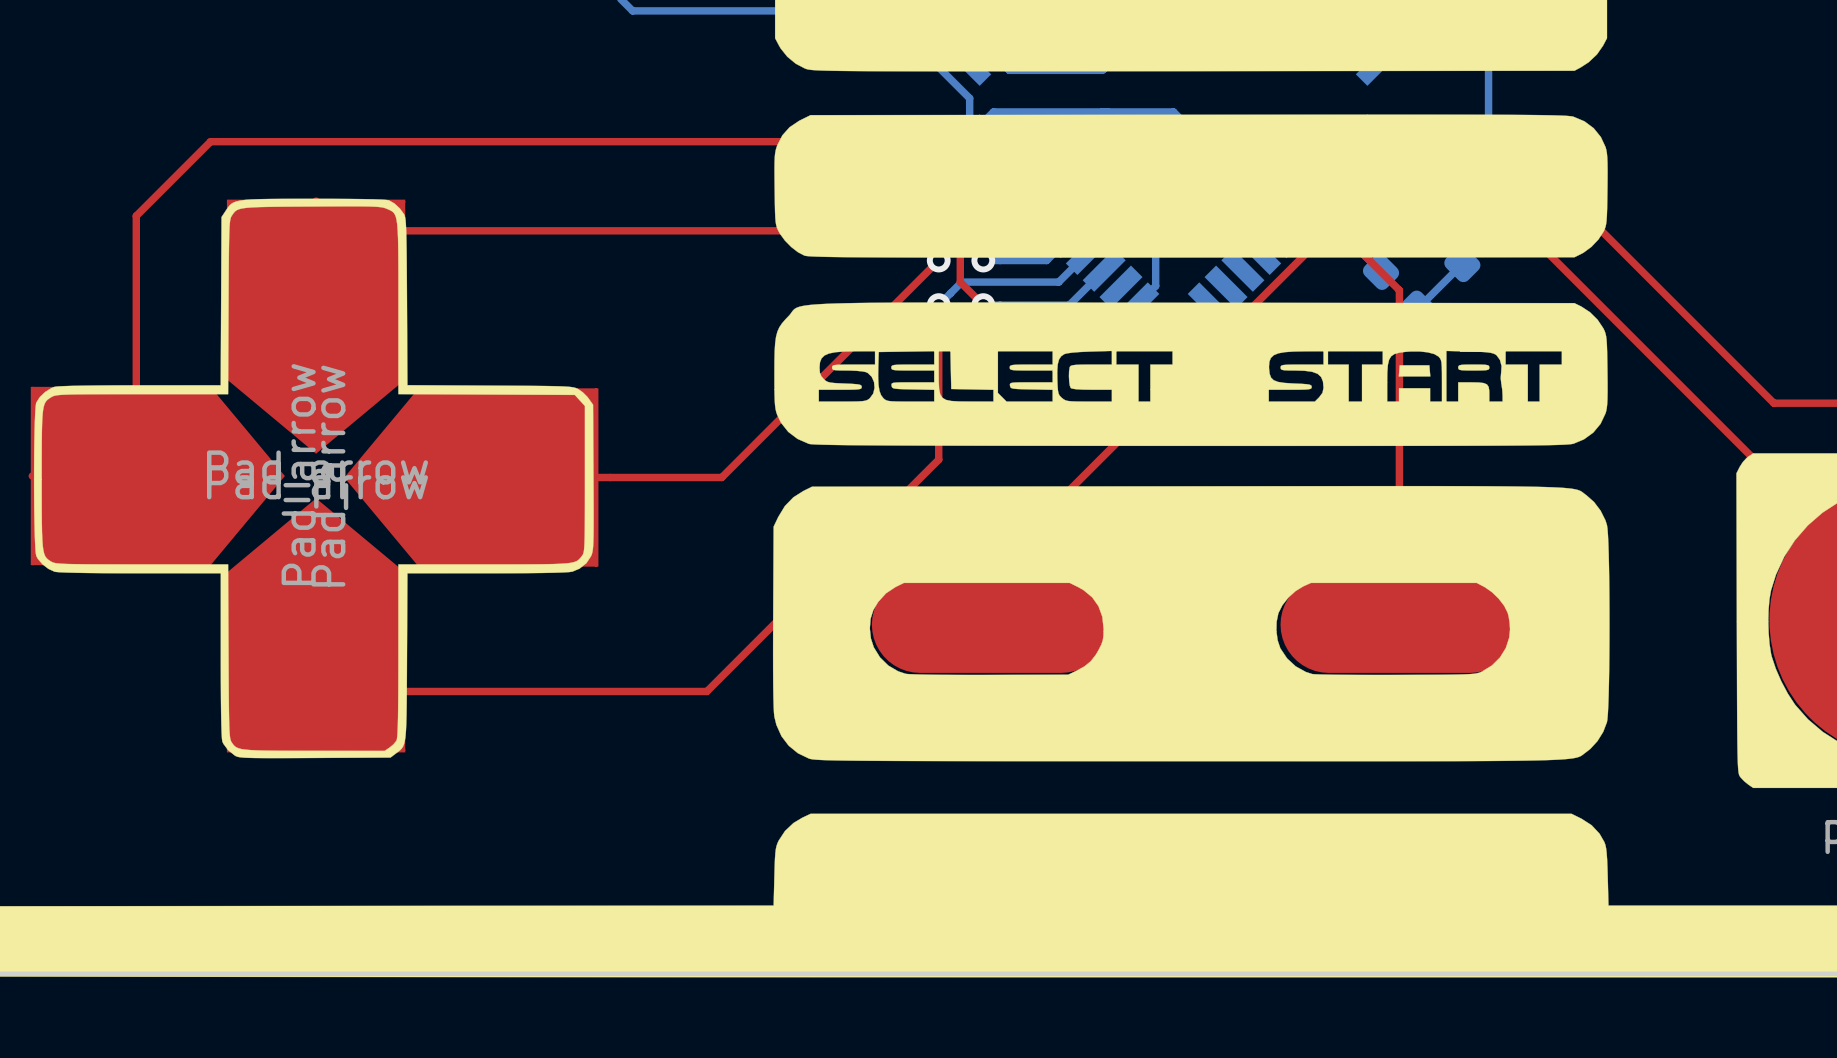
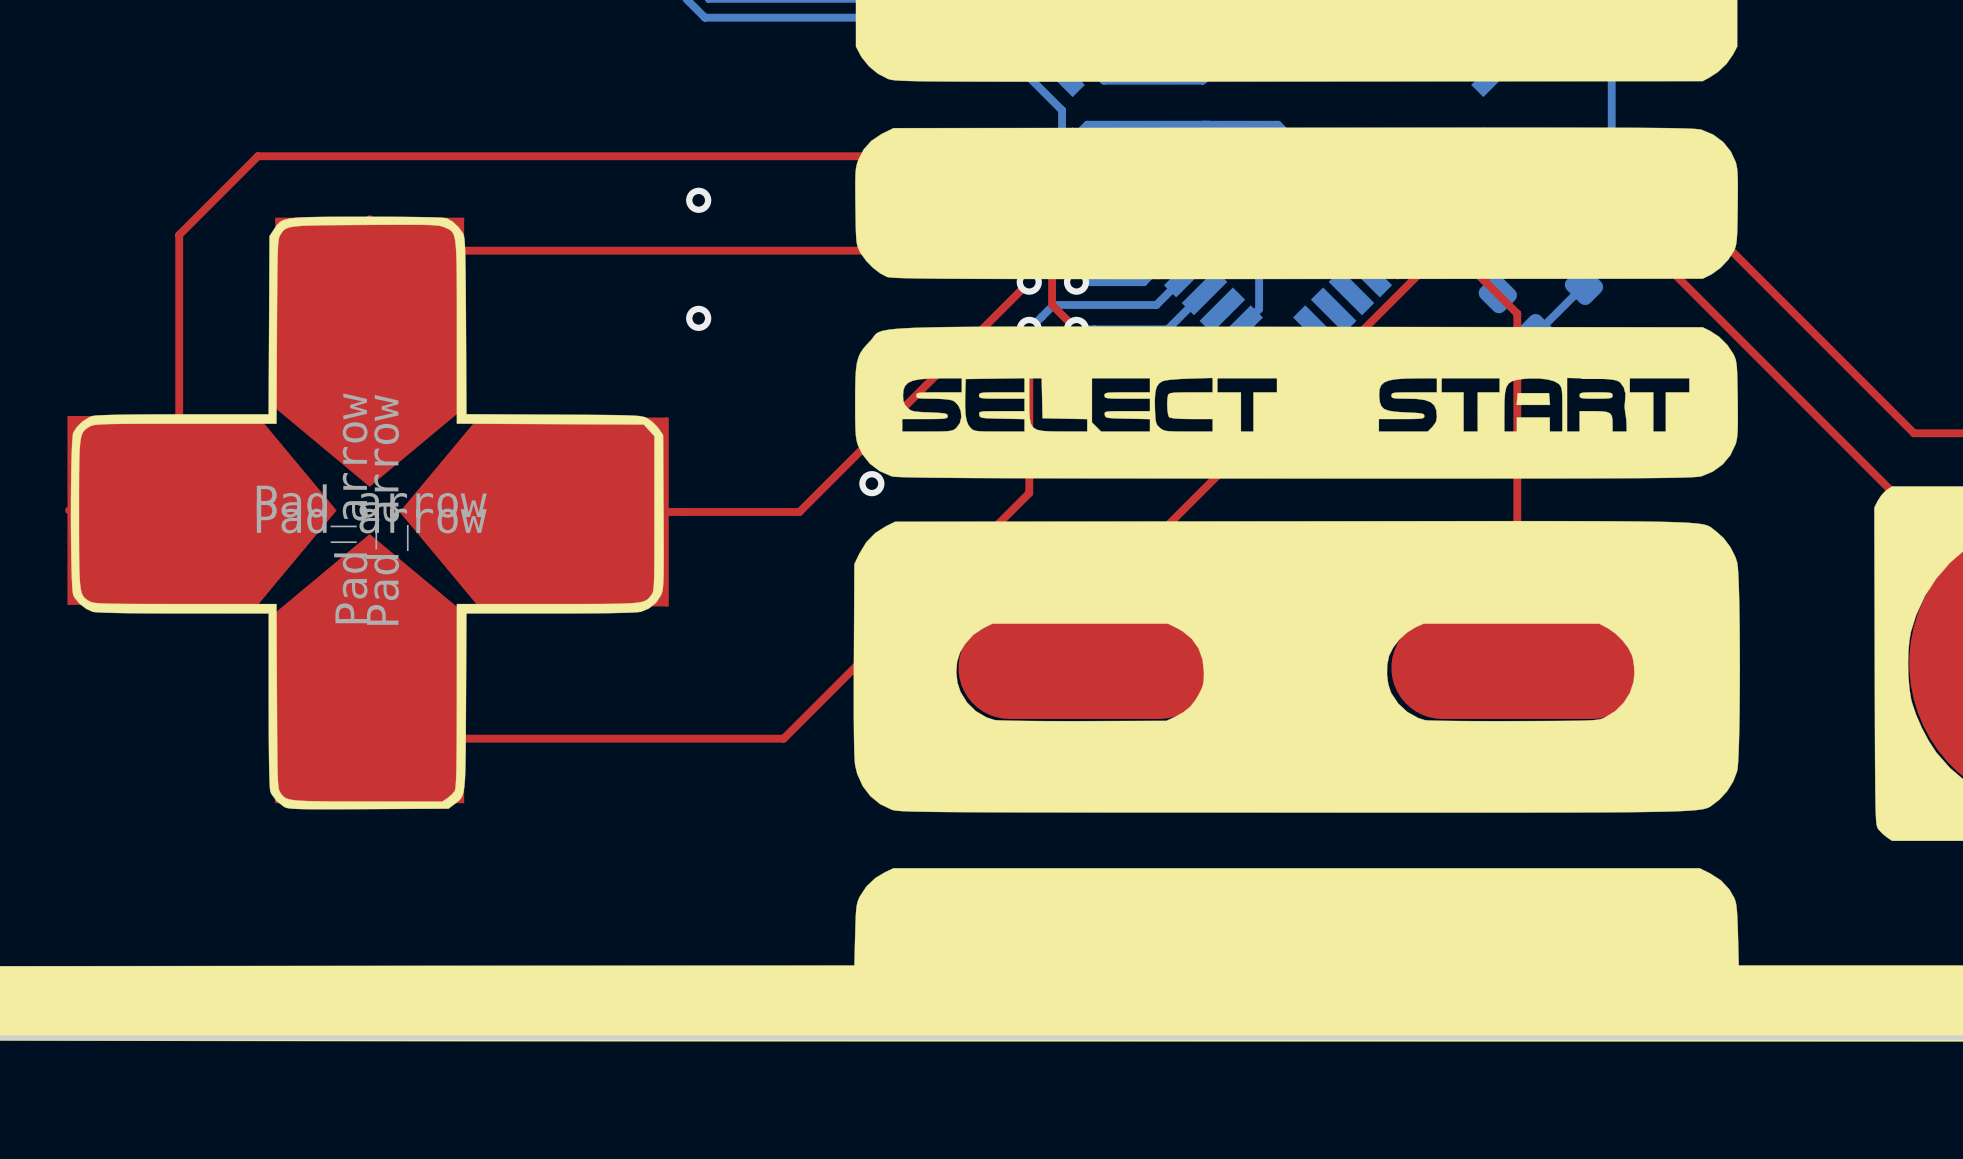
via: none -> (698, 200)
via: none -> (698, 318)
via: none -> (871, 483)

